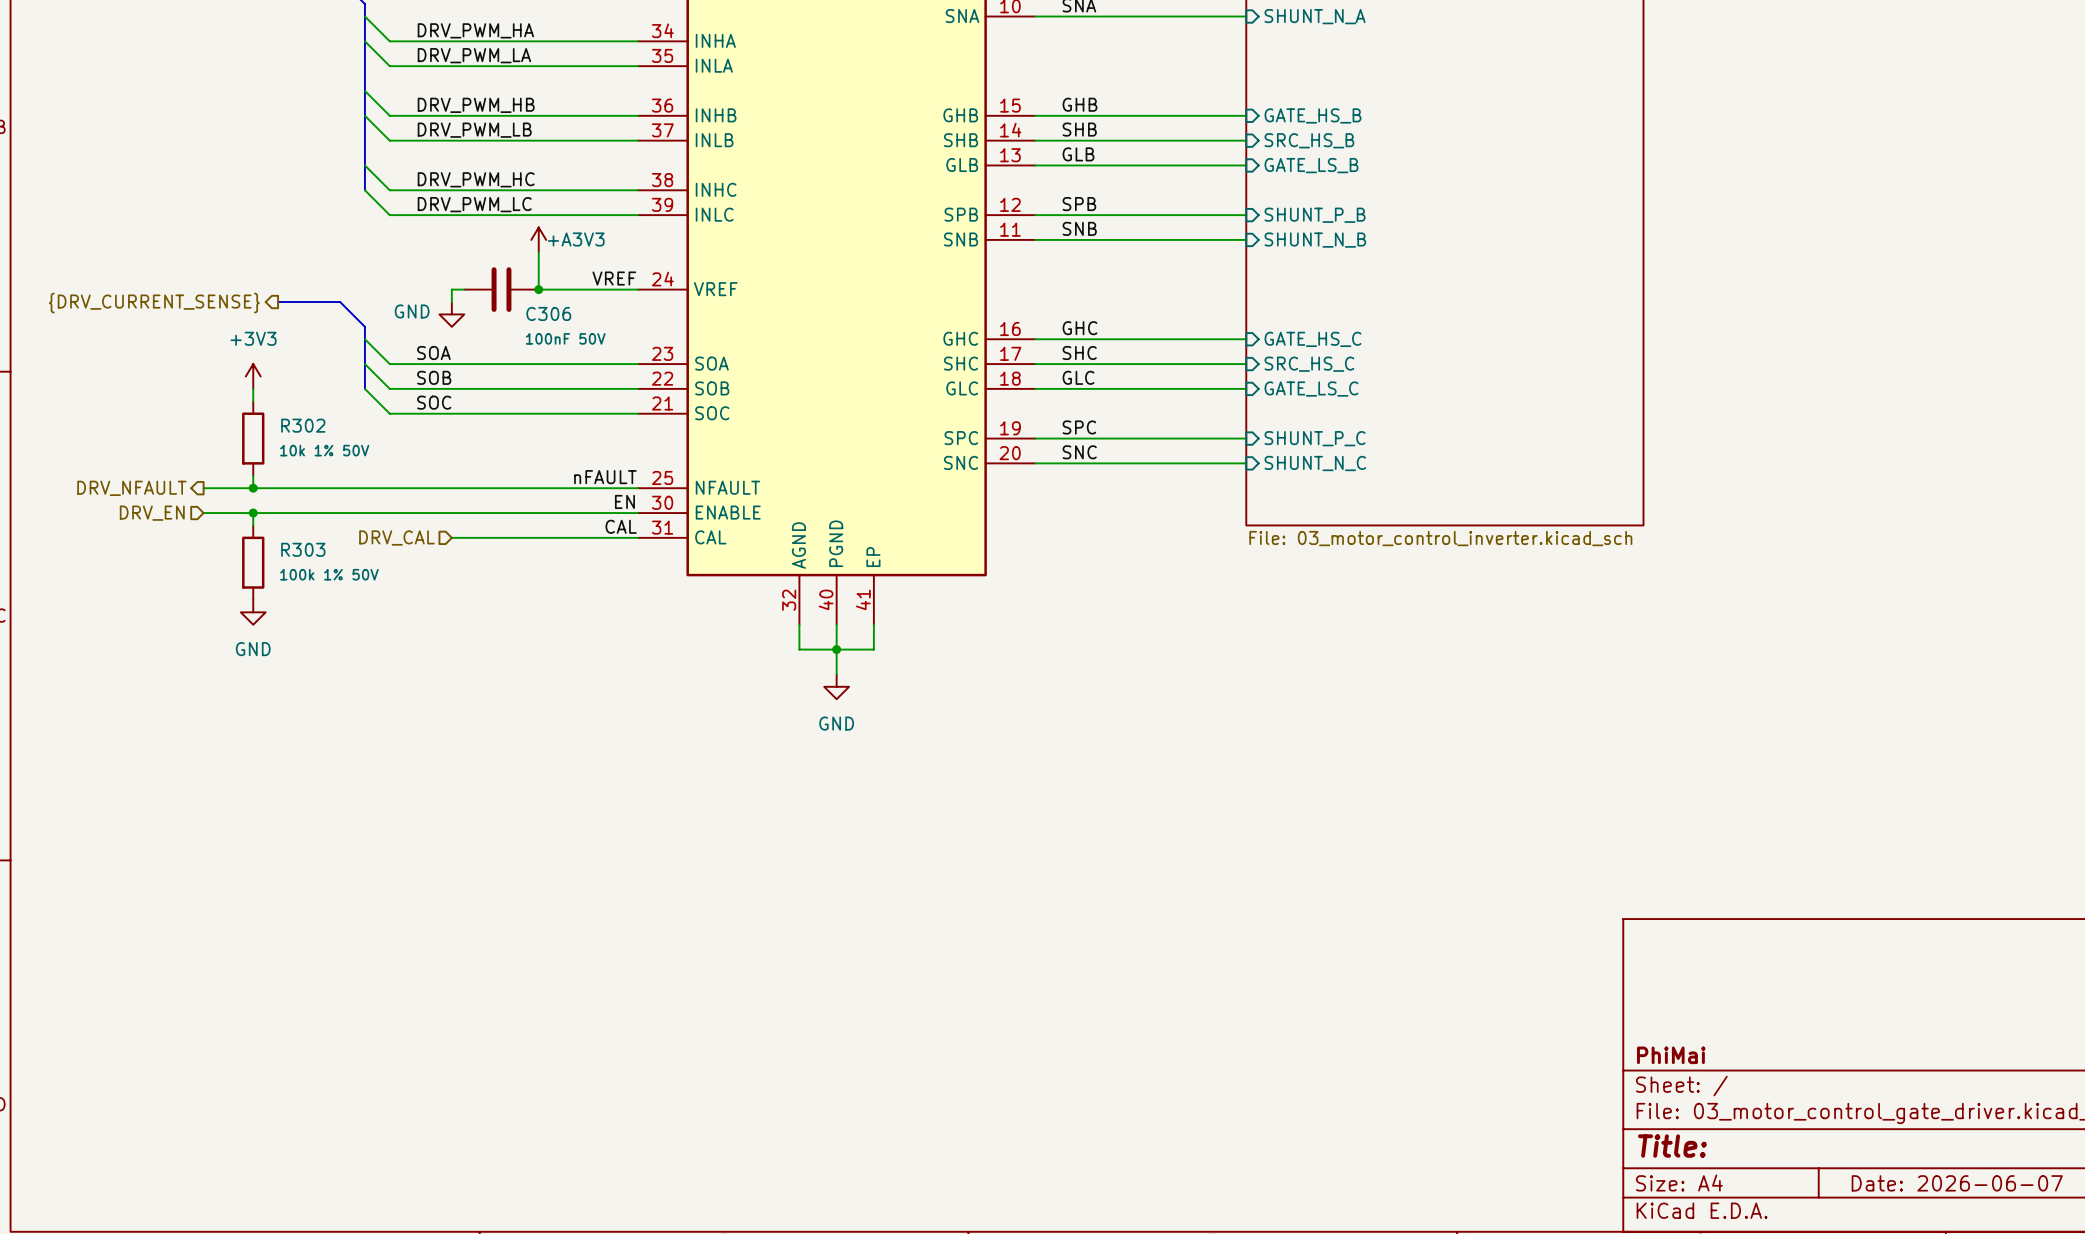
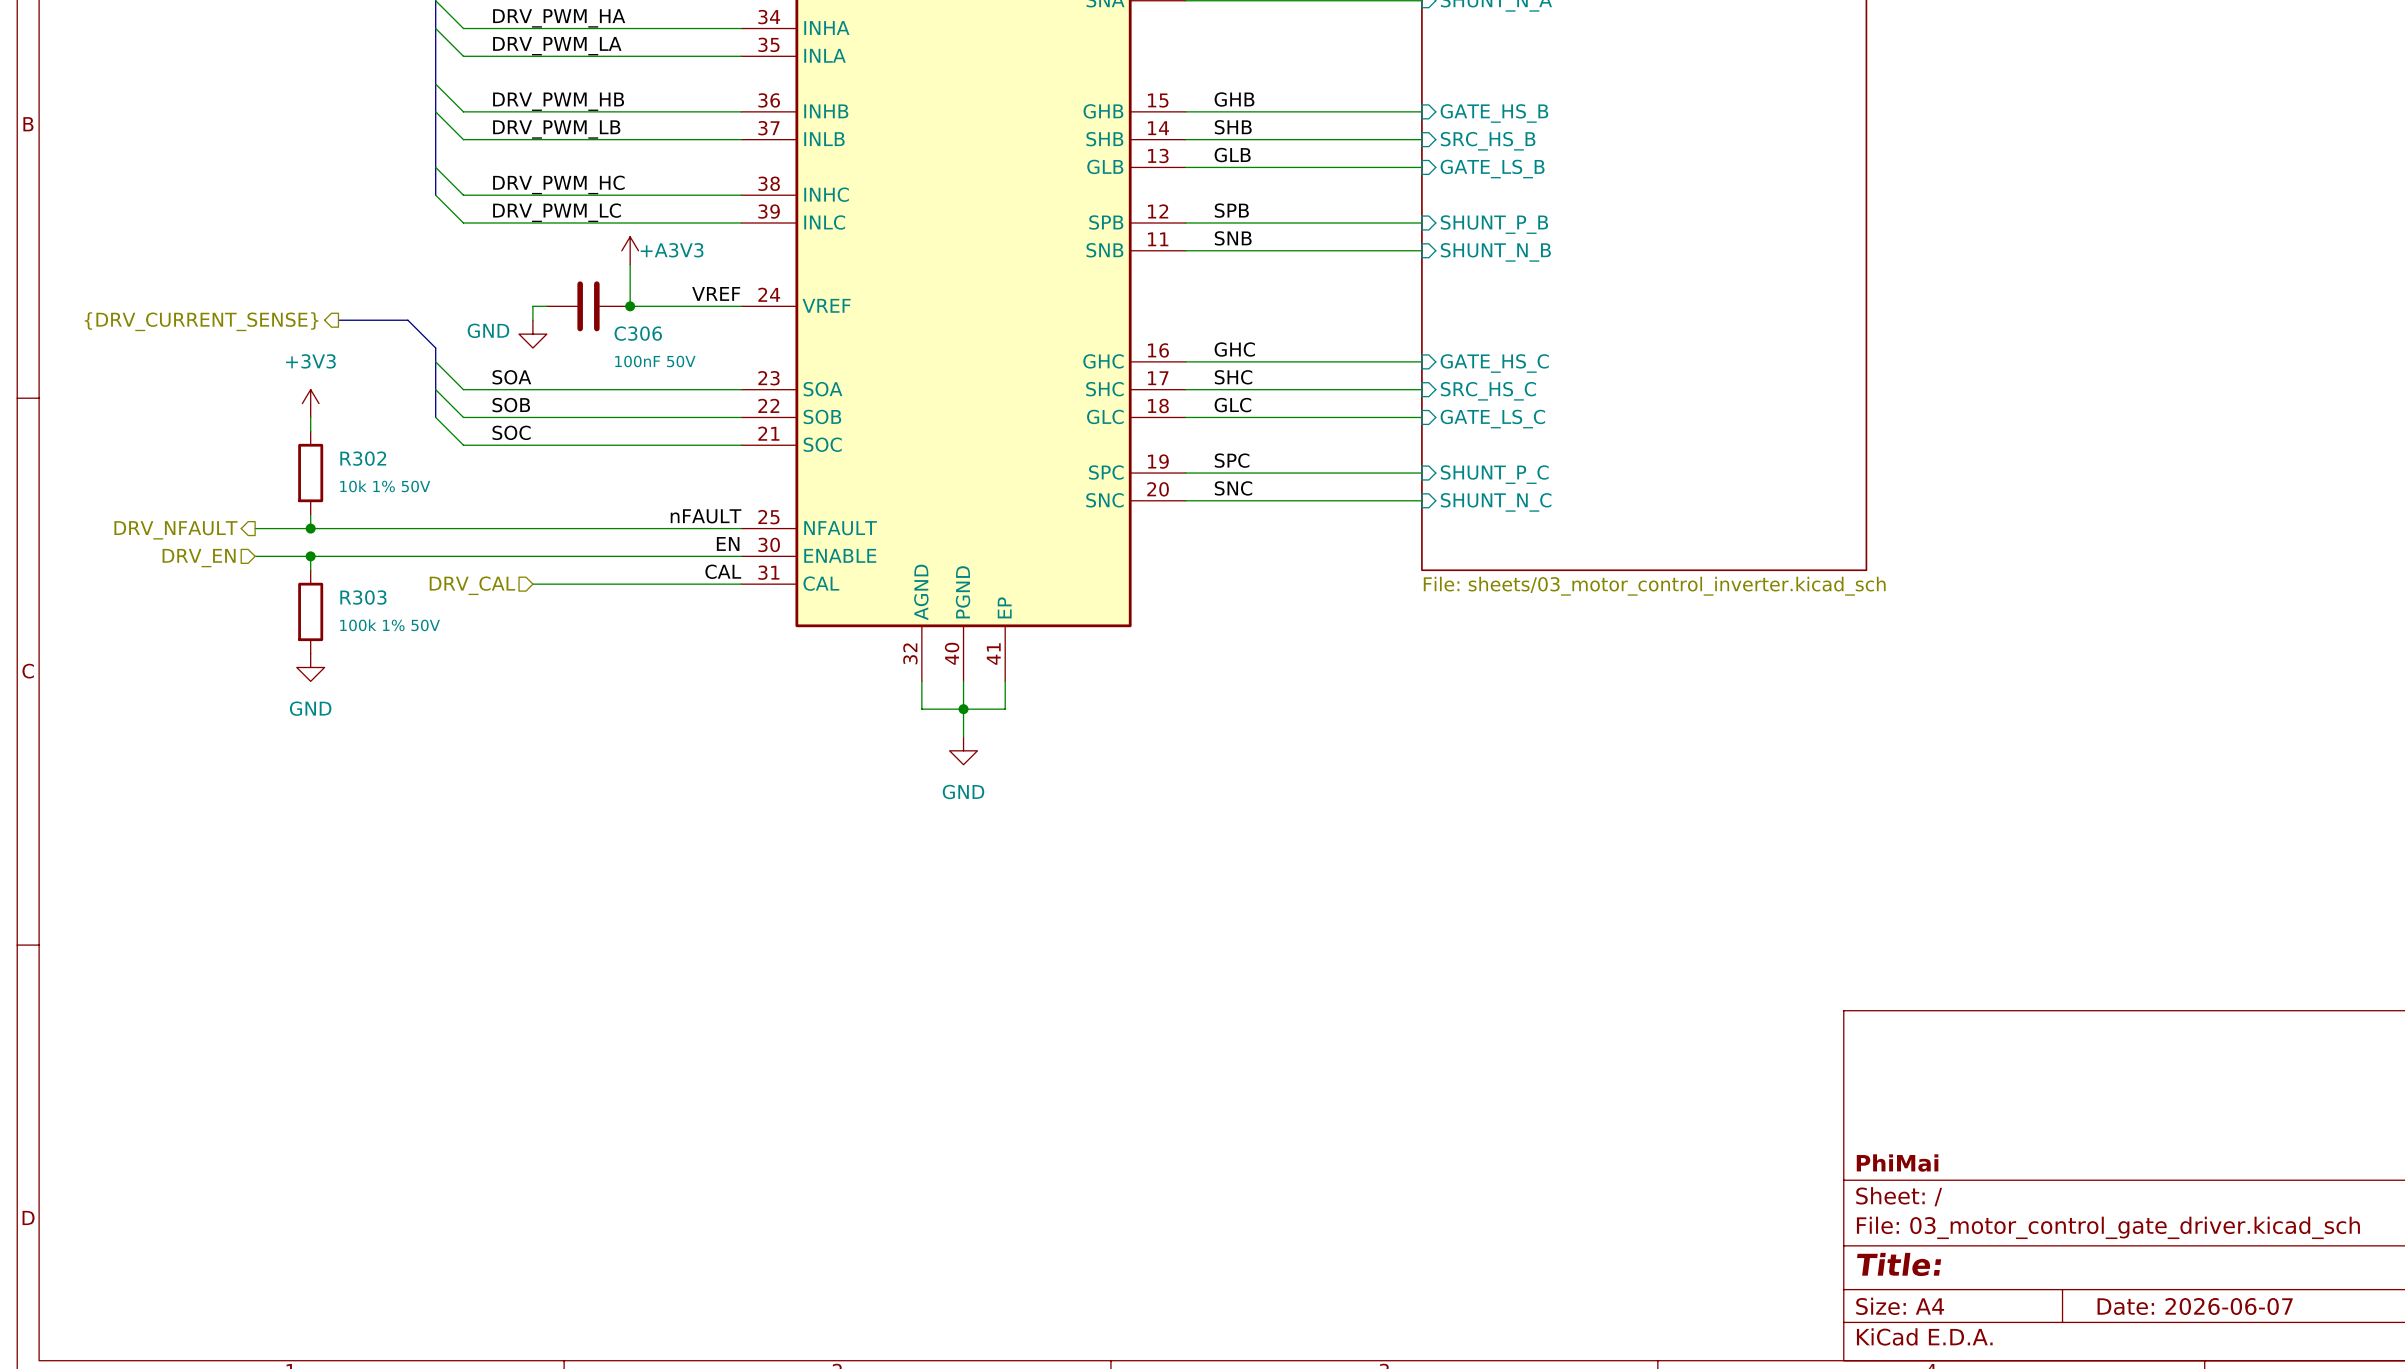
sheet value: File: 03_motor_control_inverter.kicad_sch (1440, 538) -> File: sheets/03_motor_control_inverter.kicad_sch (1654, 586)

